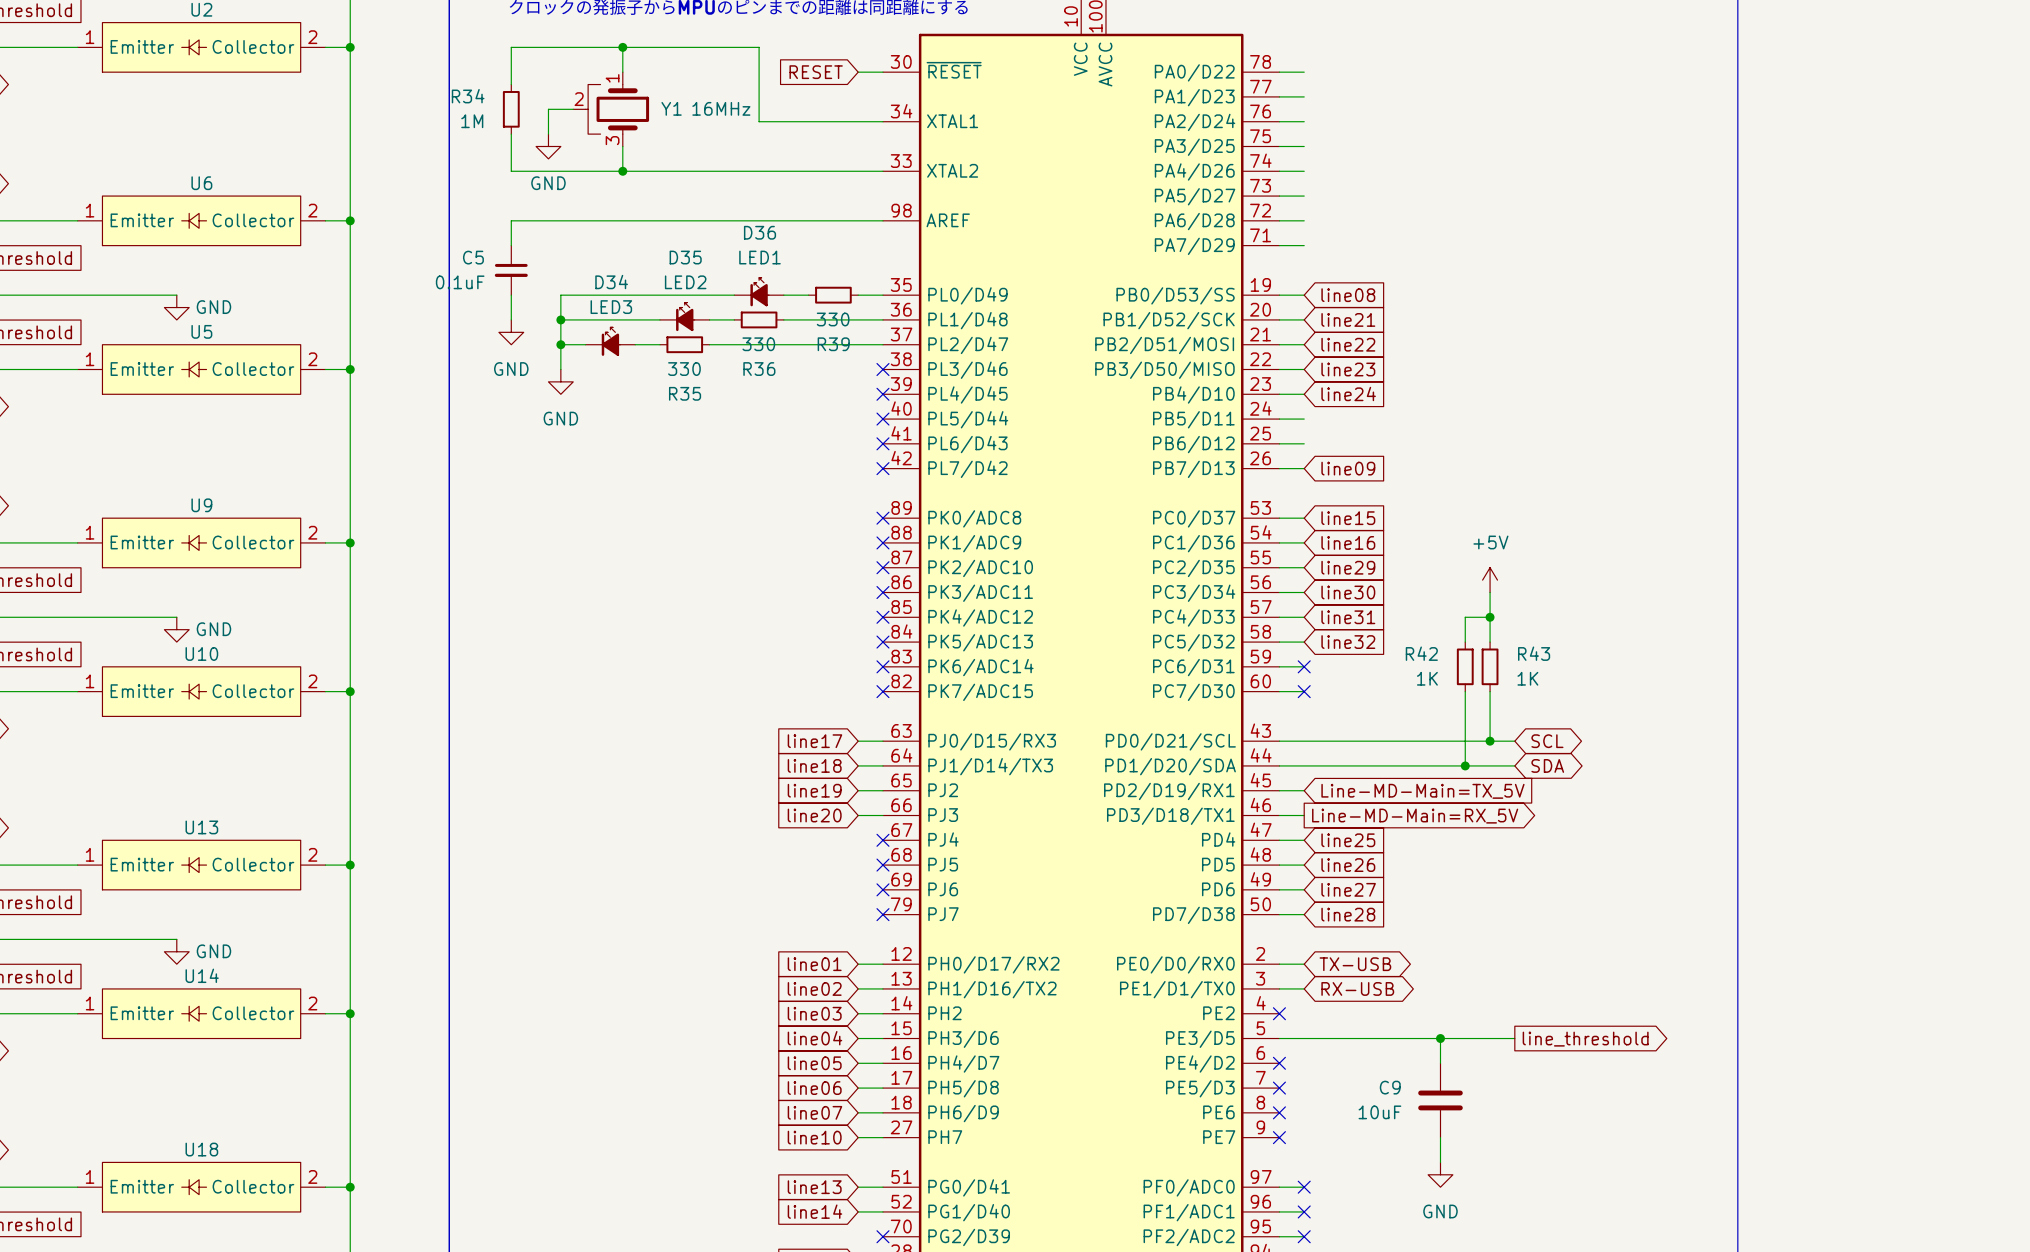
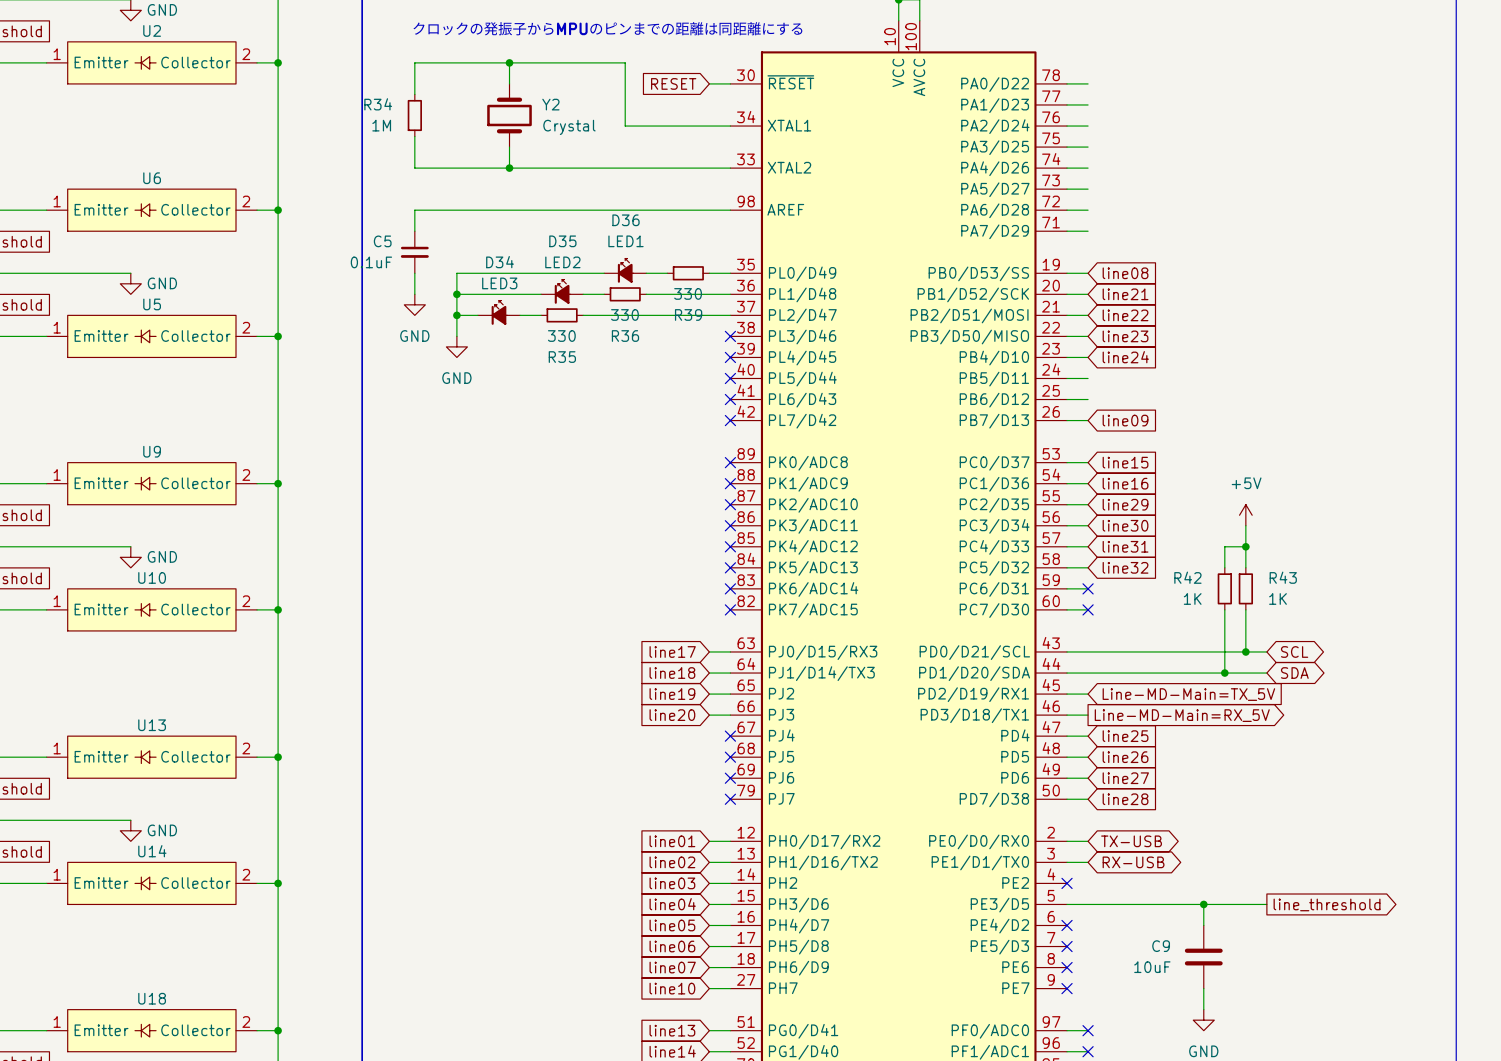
wire: (573, 109) (548, 109) (548, 134) -> none
Y1: 16MHz (611, 109) -> none
Y2: none -> Crystal (509, 115)
power symbol: GND (548, 146) -> none

